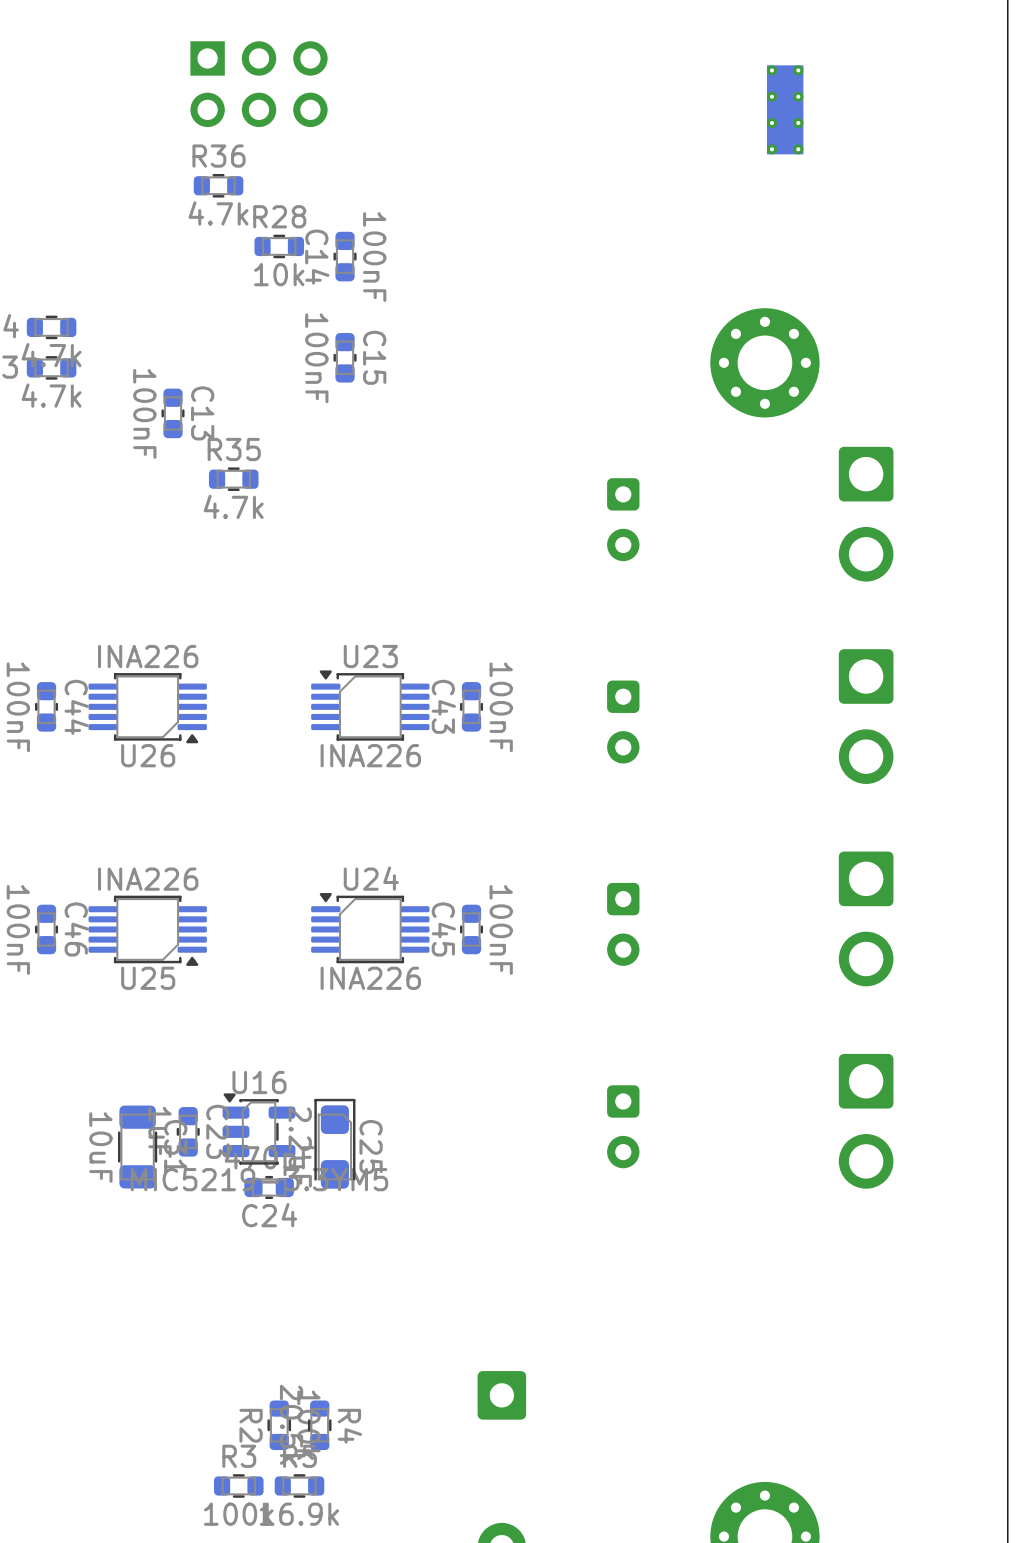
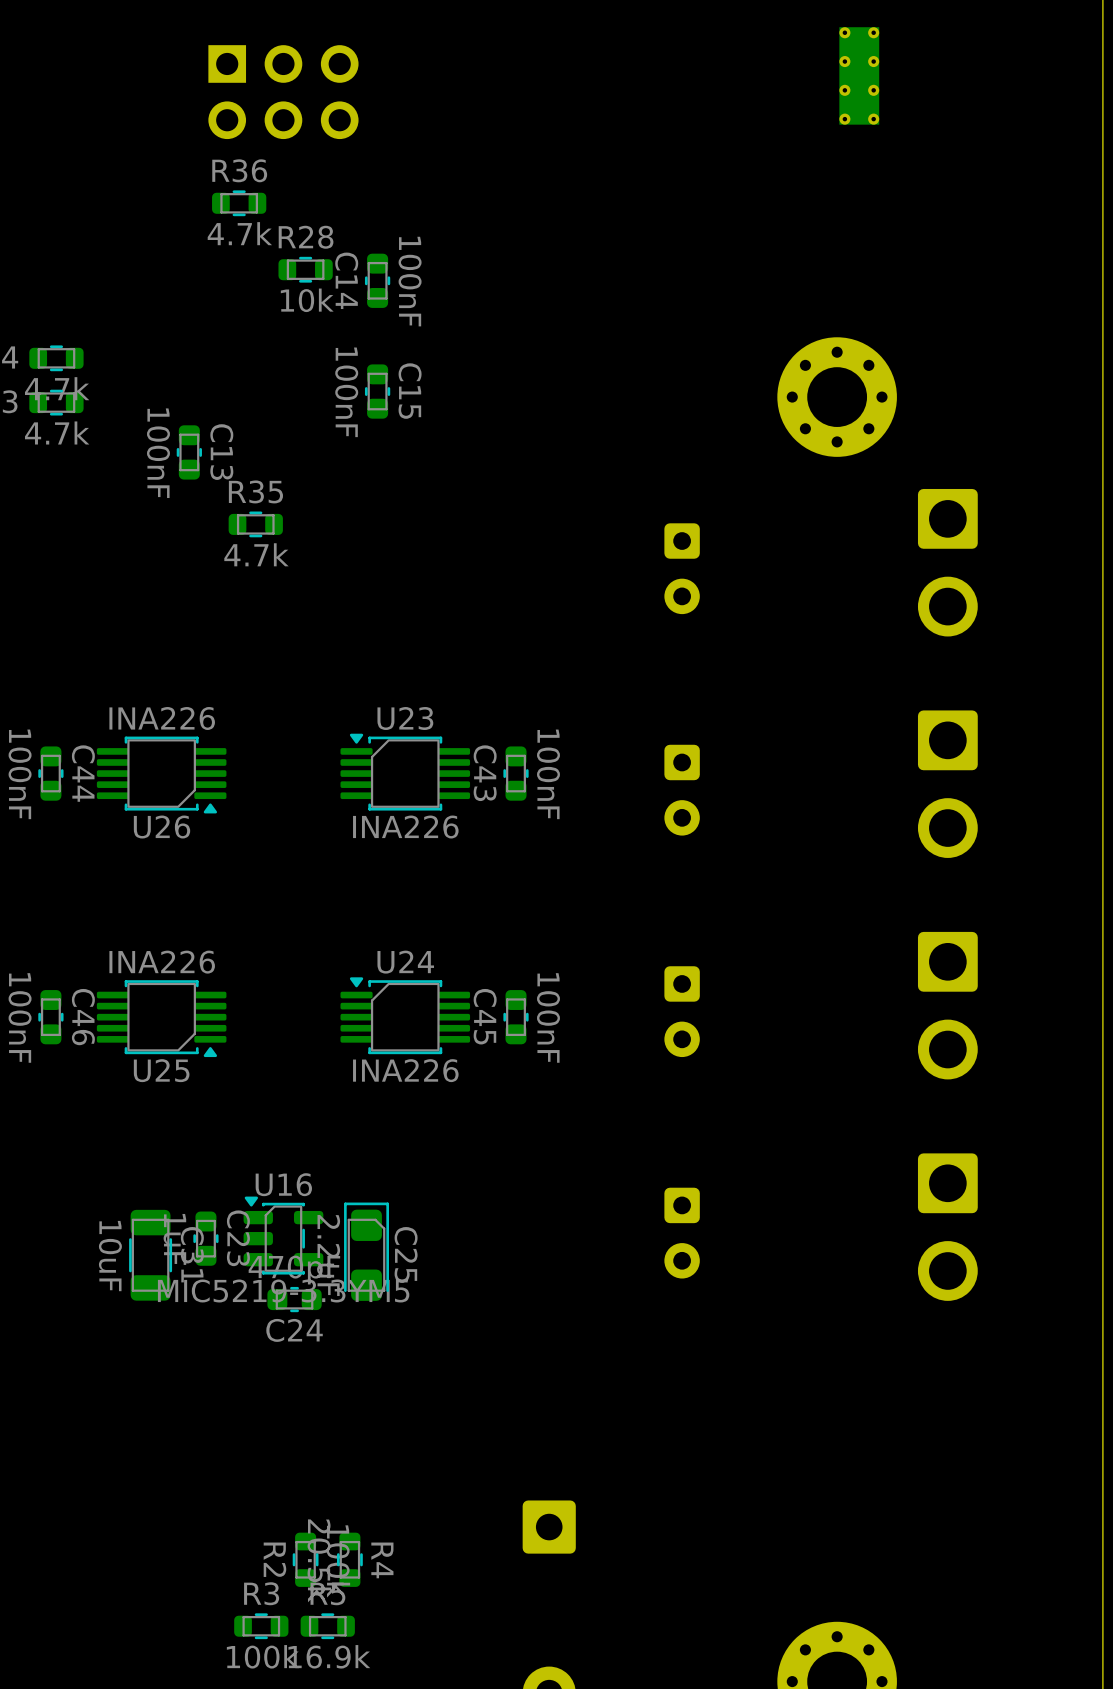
part position: (785, 109) -> (859, 75)

